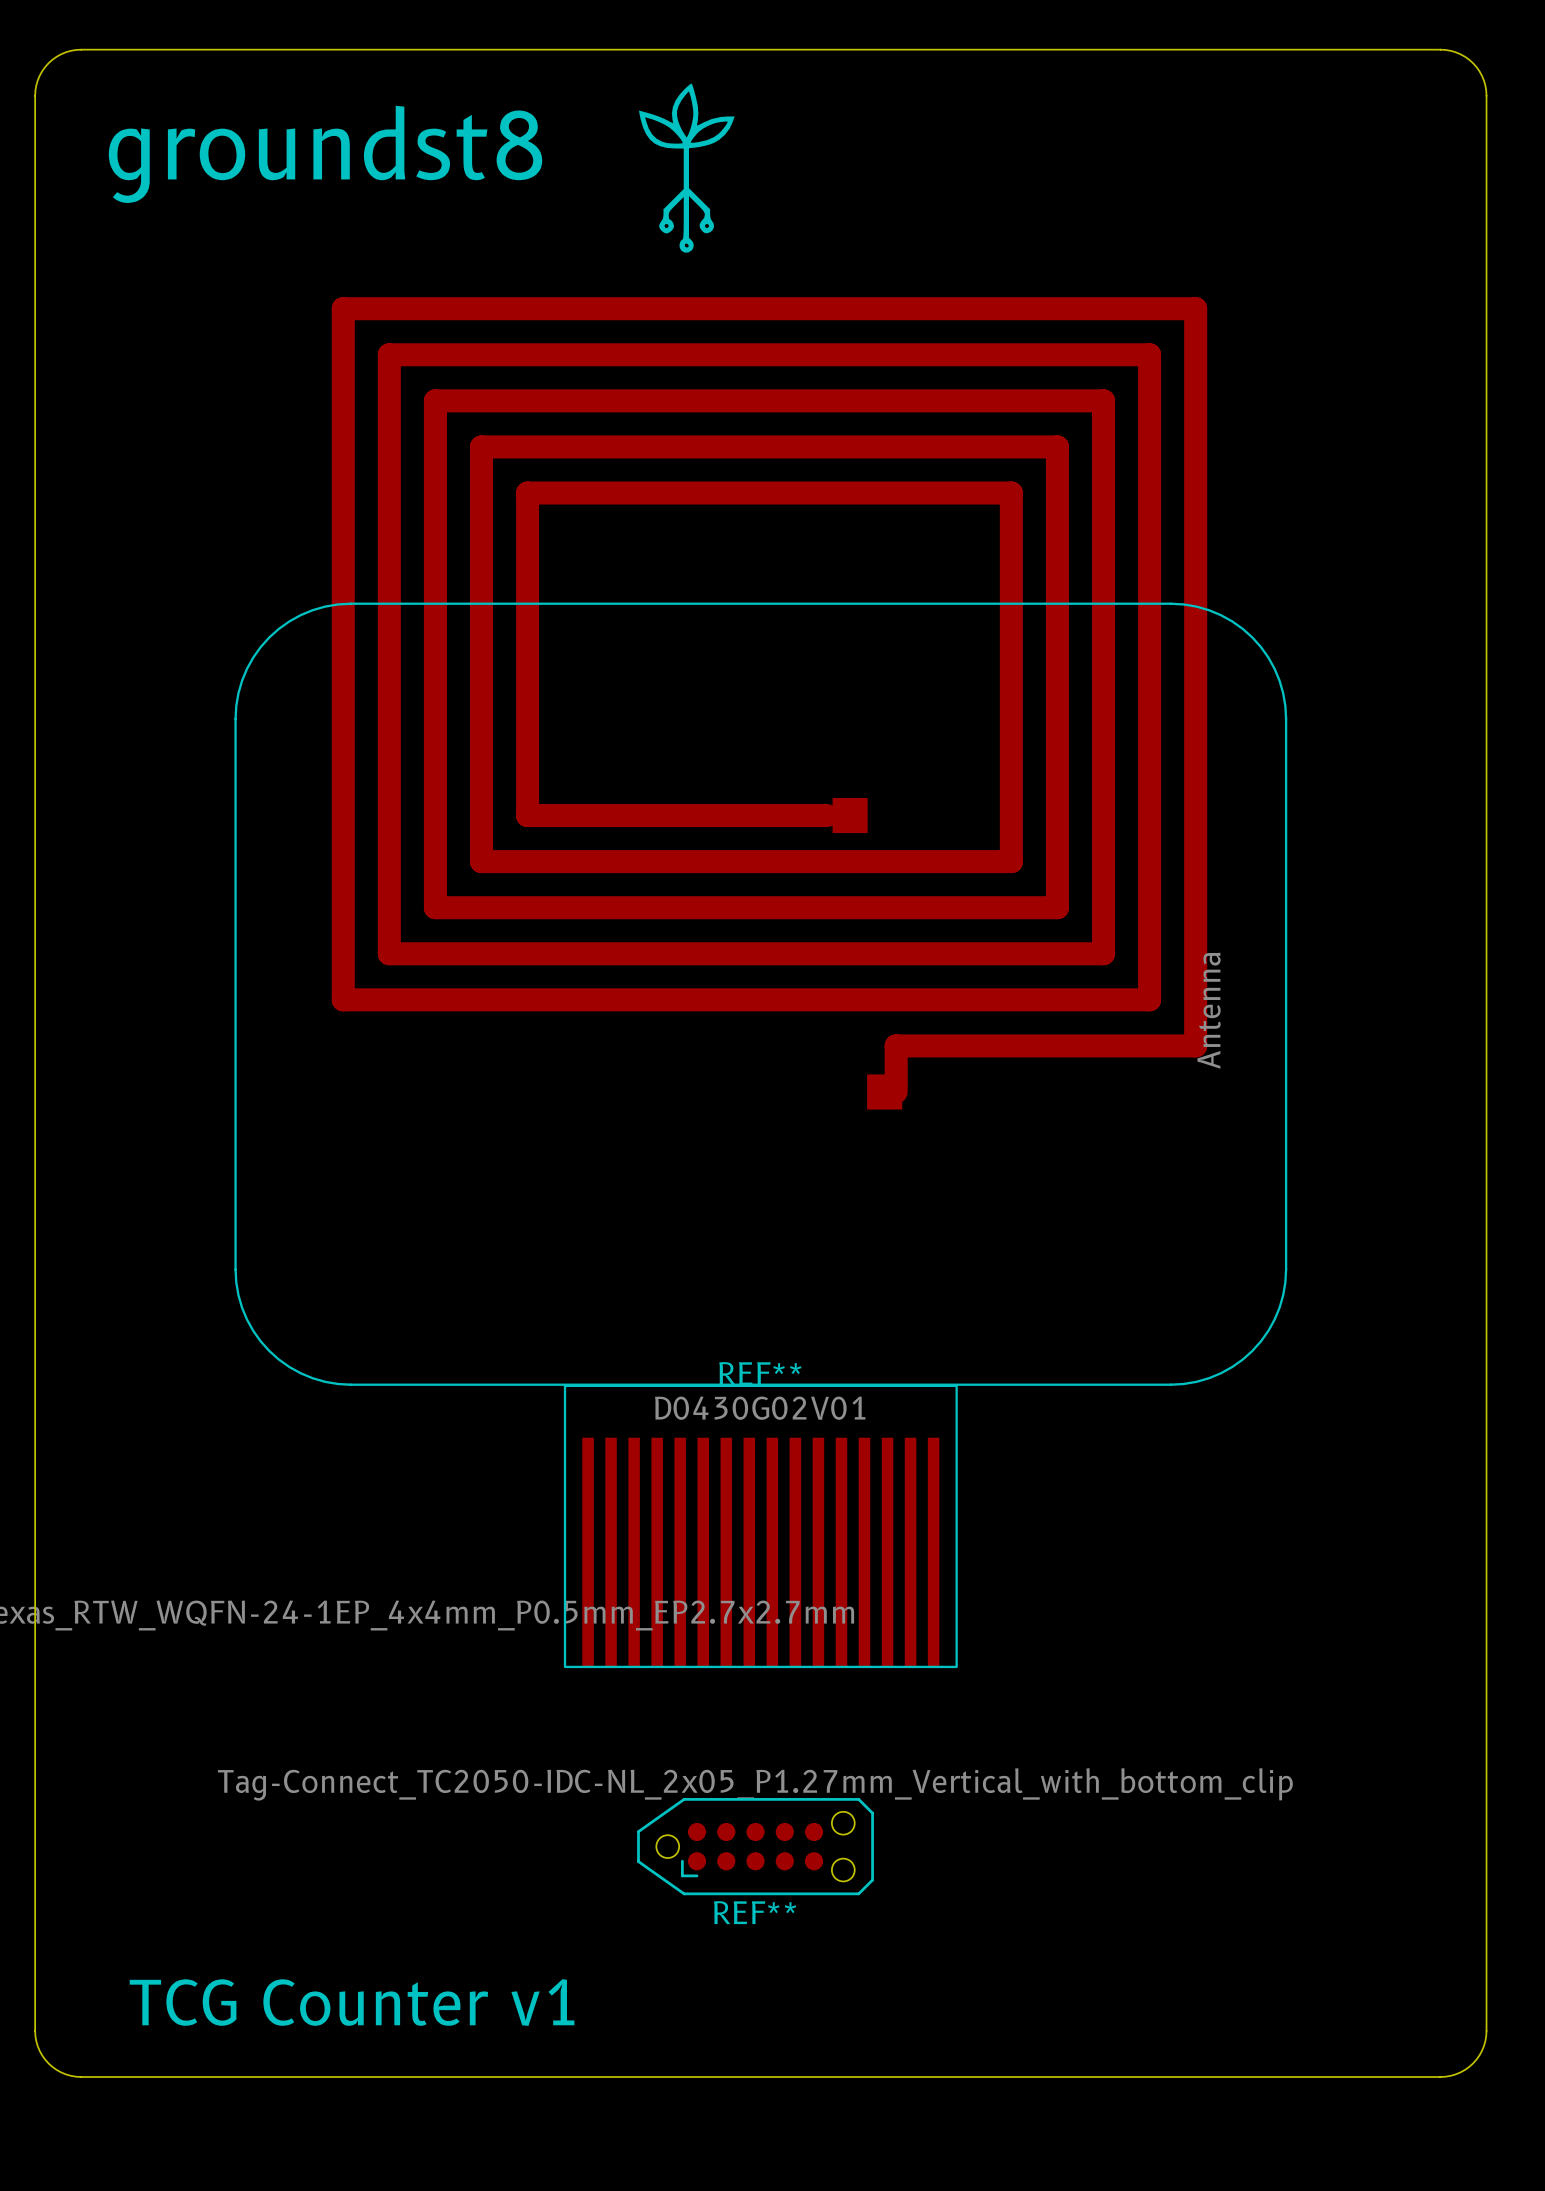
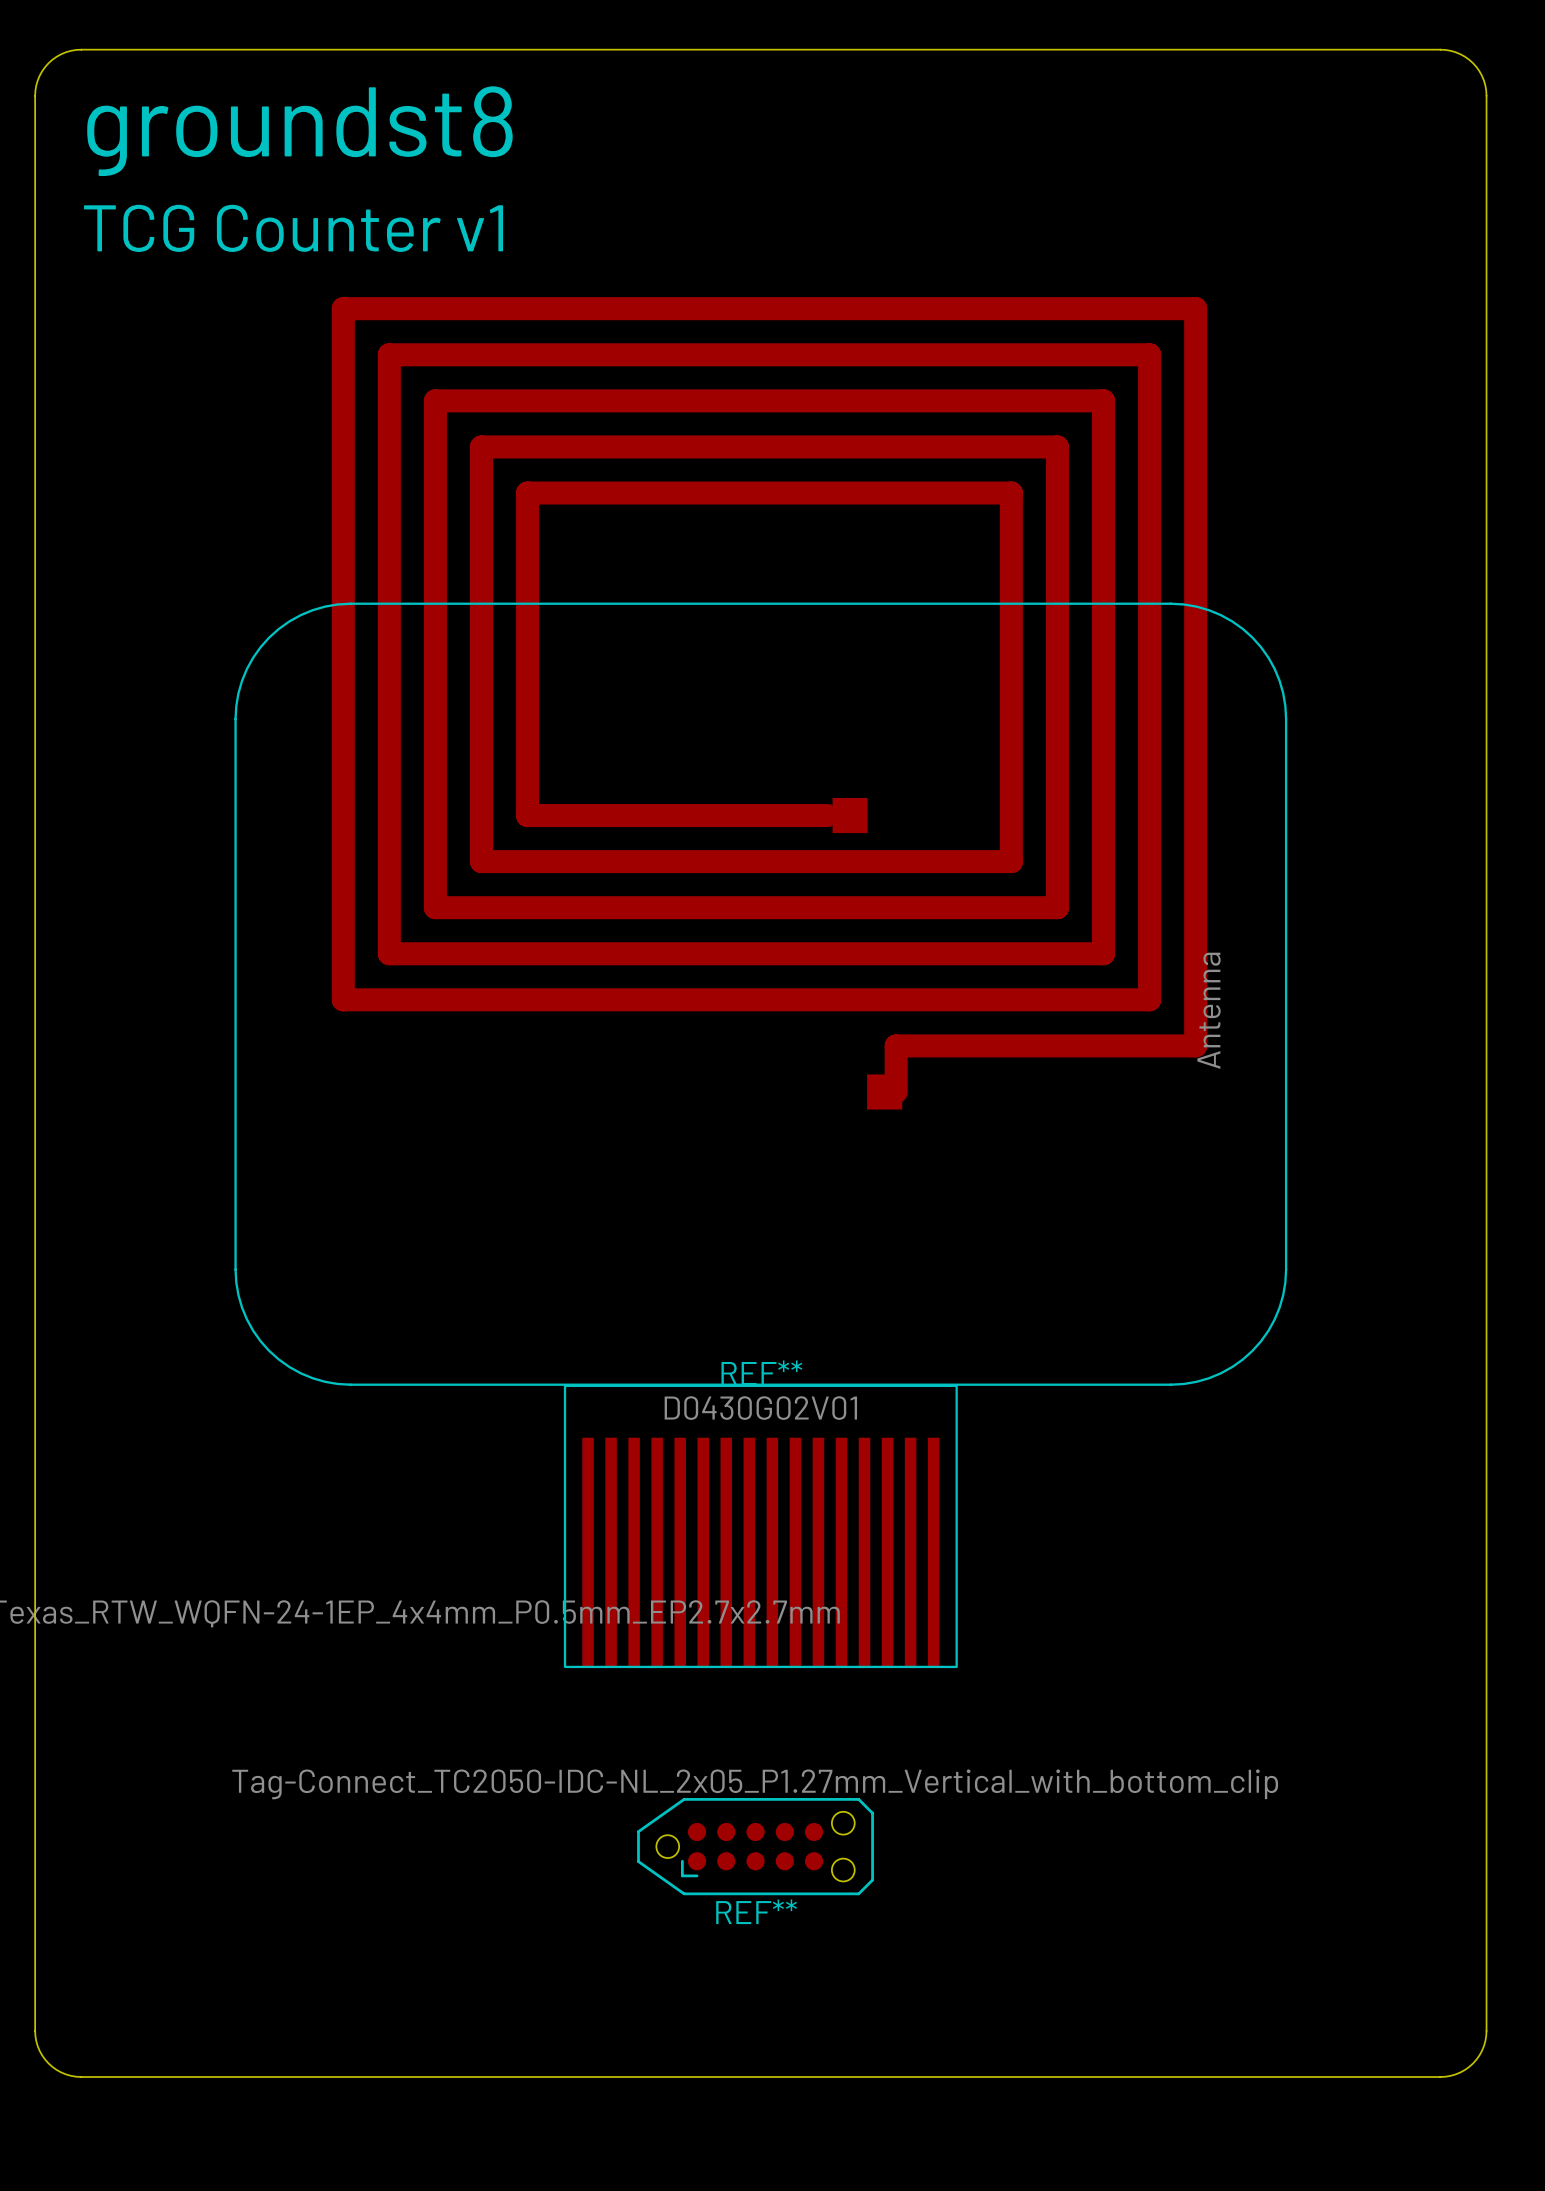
drawing: [638, 83, 735, 253] -> none
text position: groundst8 (325, 154) -> groundst8 (299, 131)
text: none -> TCG Counter v1 (293, 228)
text: TCG Counter v1 (352, 2002) -> none

